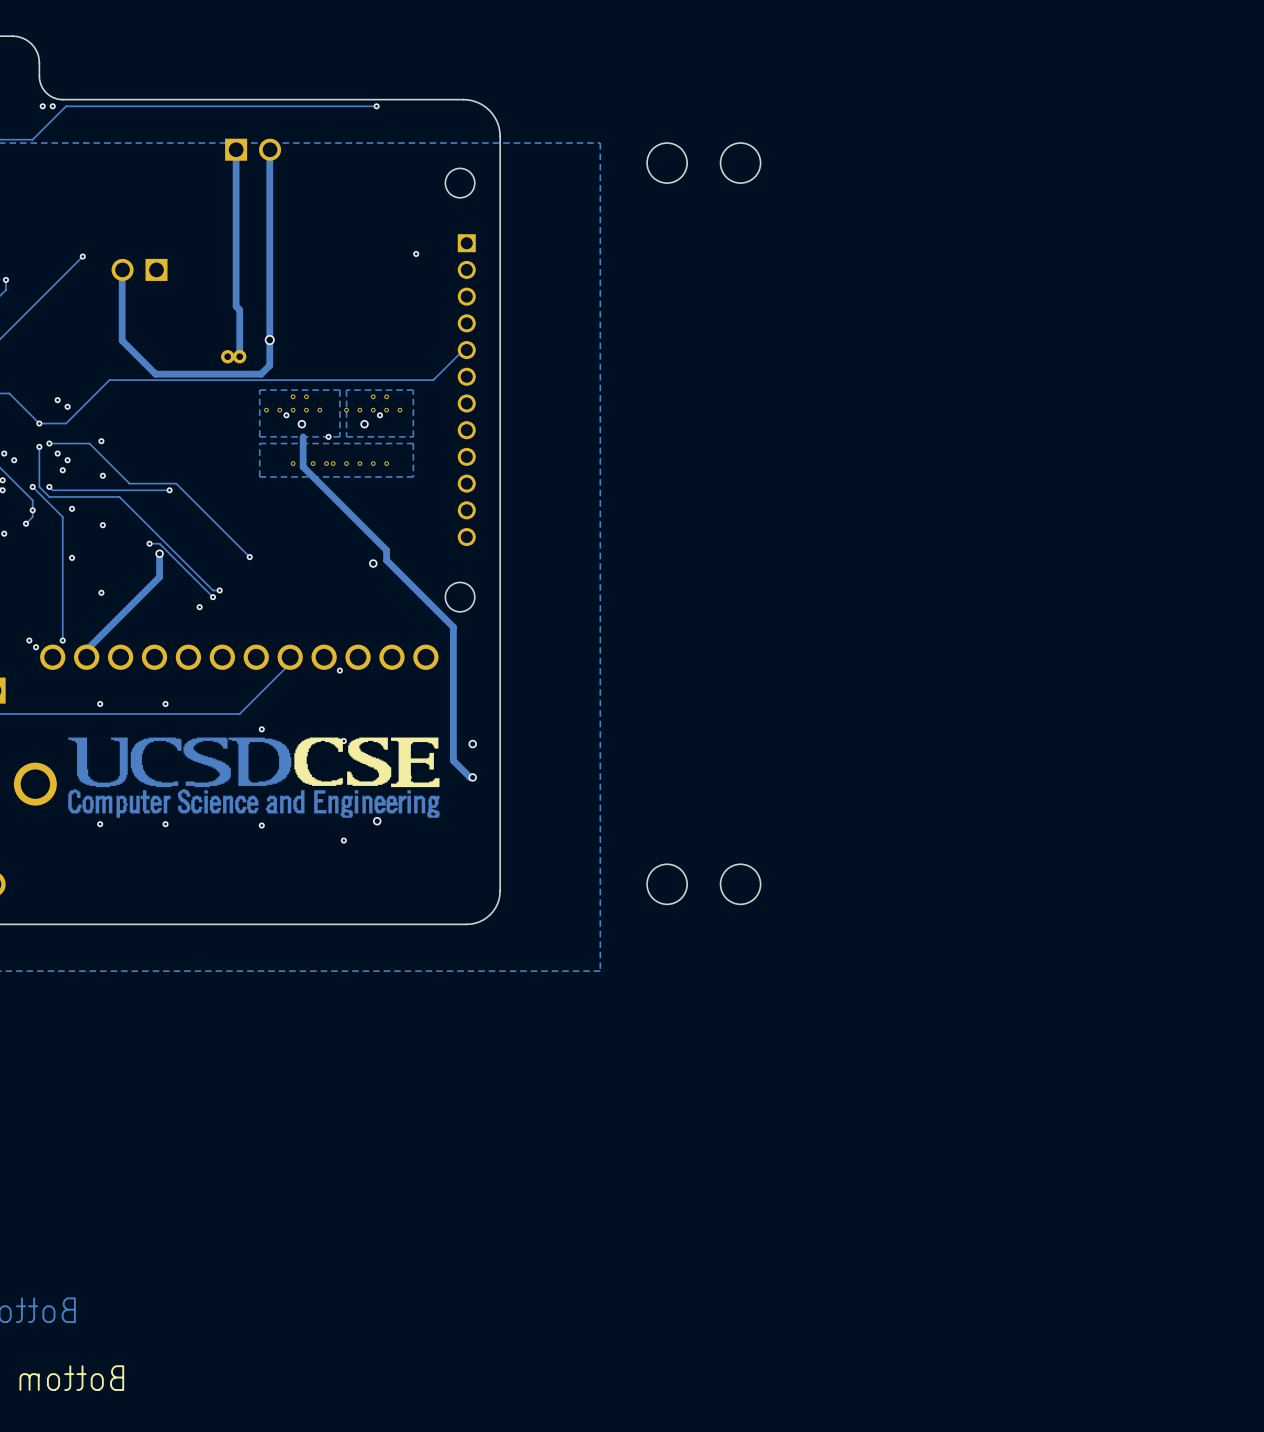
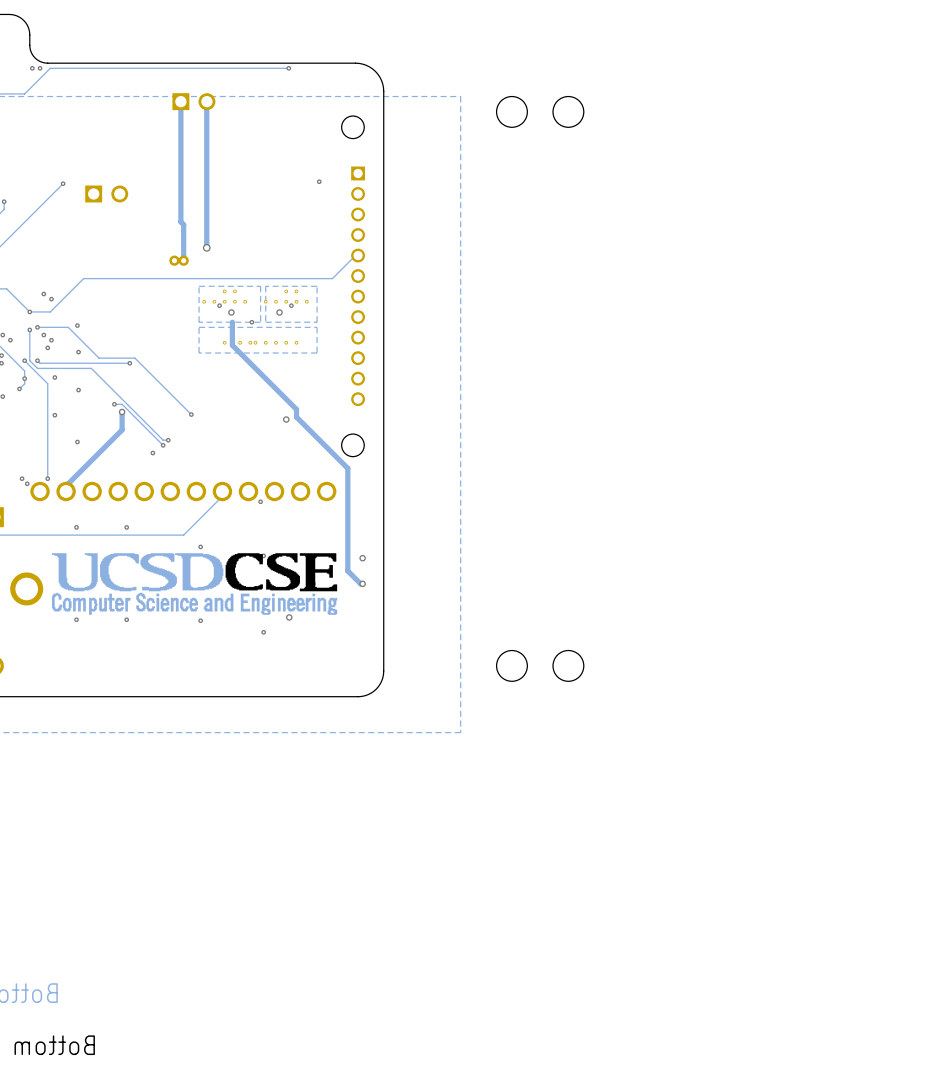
track: (122, 269) (122, 340) (155, 374) (261, 374) (269, 365) (269, 340) -> none
part rotation: 0° (139, 269) -> 180° (106, 193)

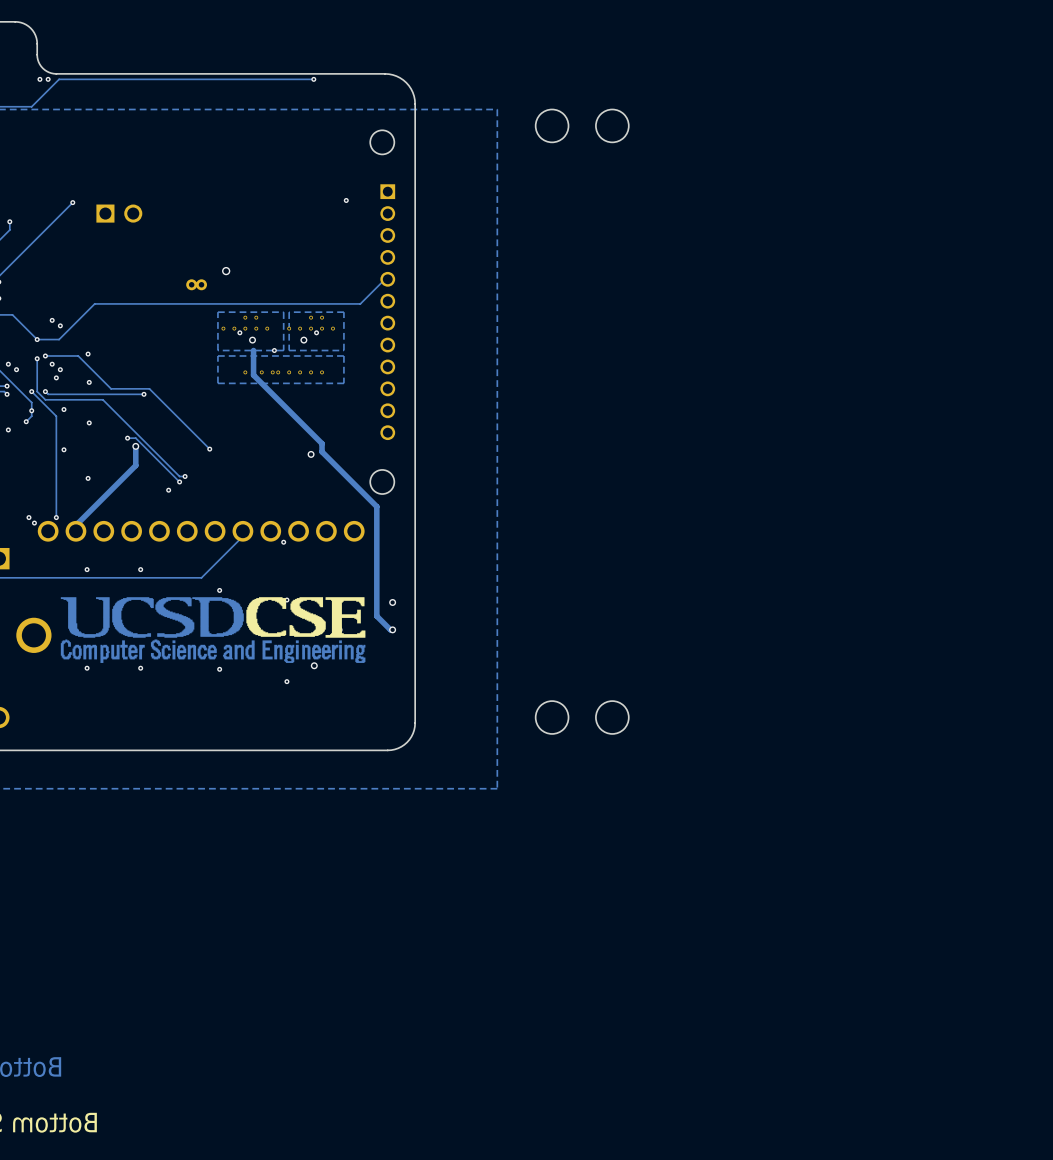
track: (180, 101) (180, 221) (183, 224) (183, 260) -> none
part: (193, 101) -> none
track: (206, 101) (206, 247) -> none

